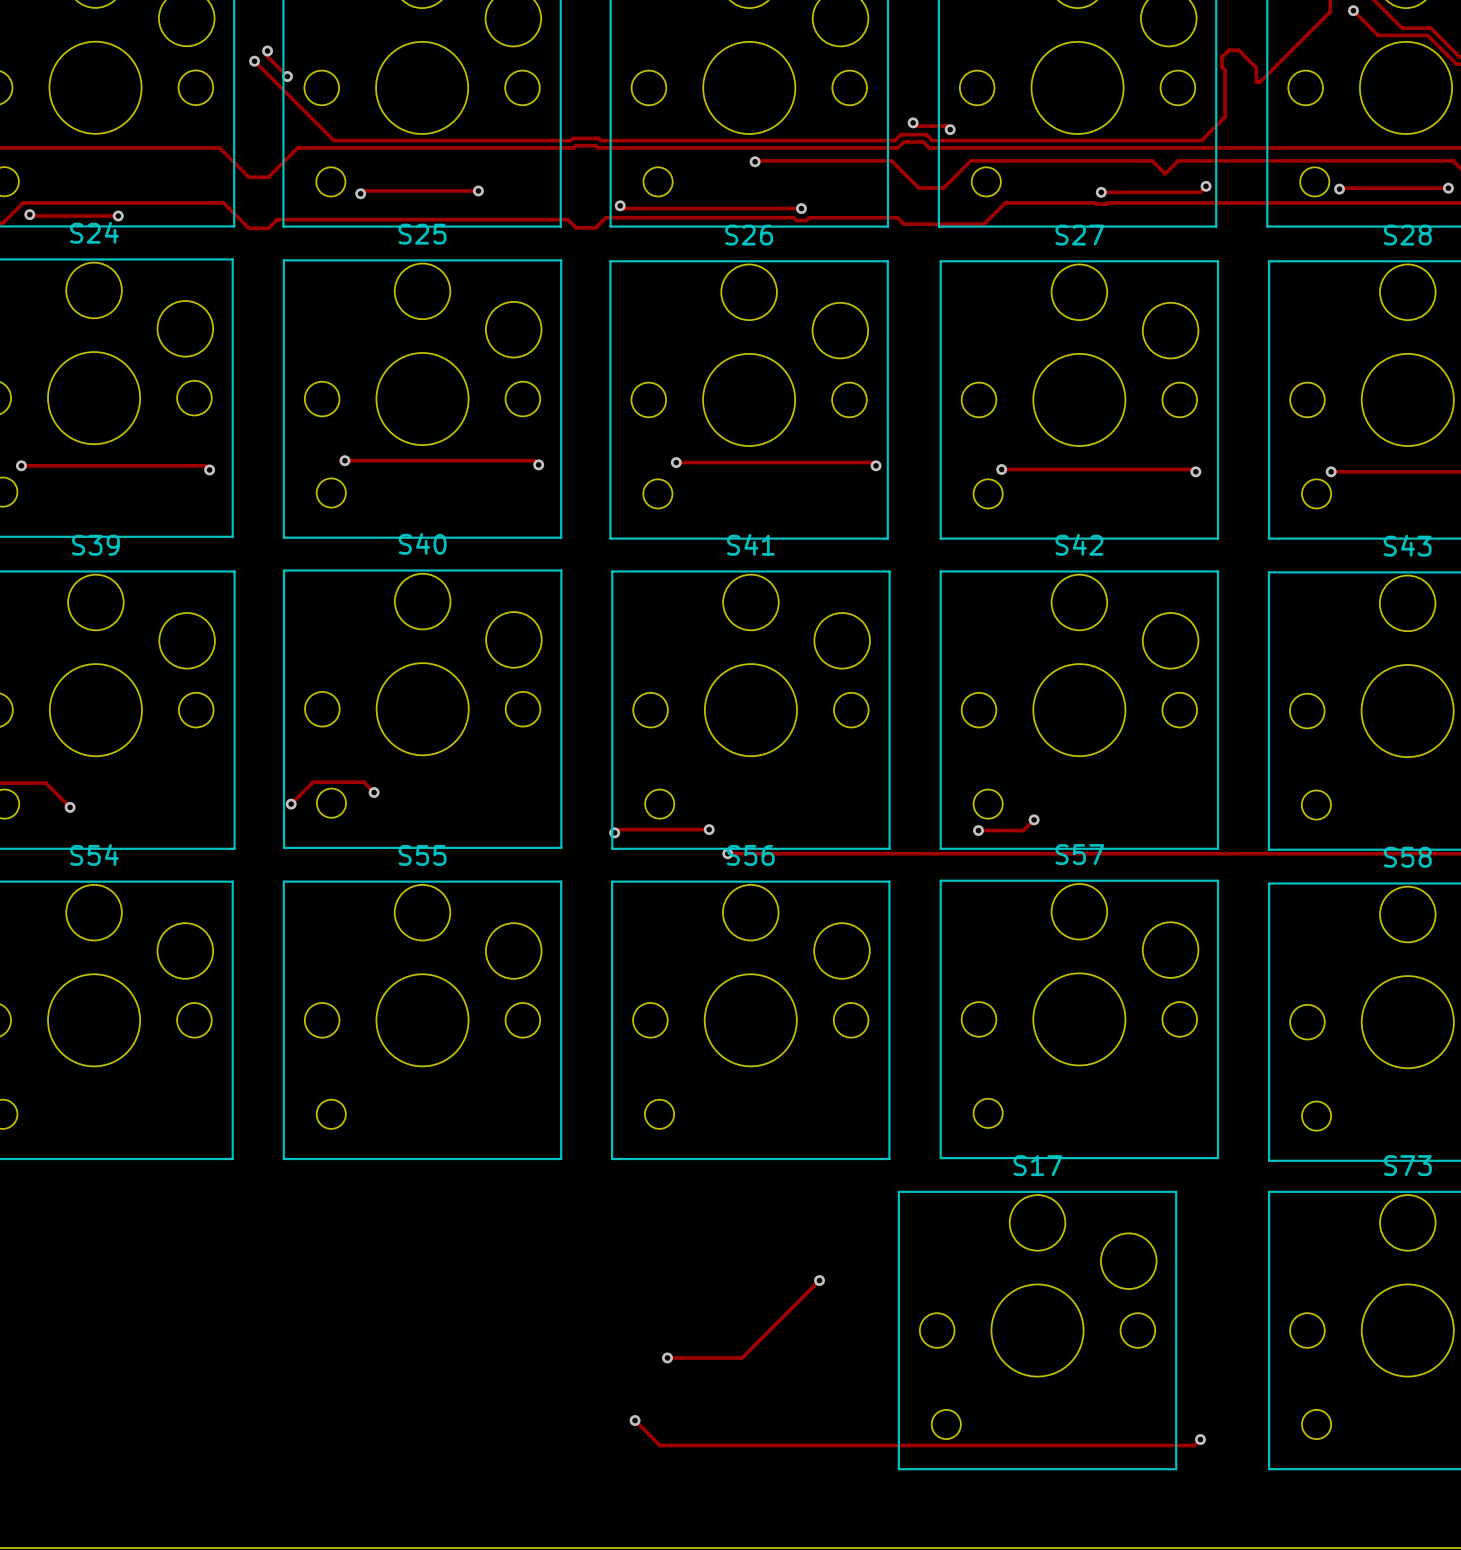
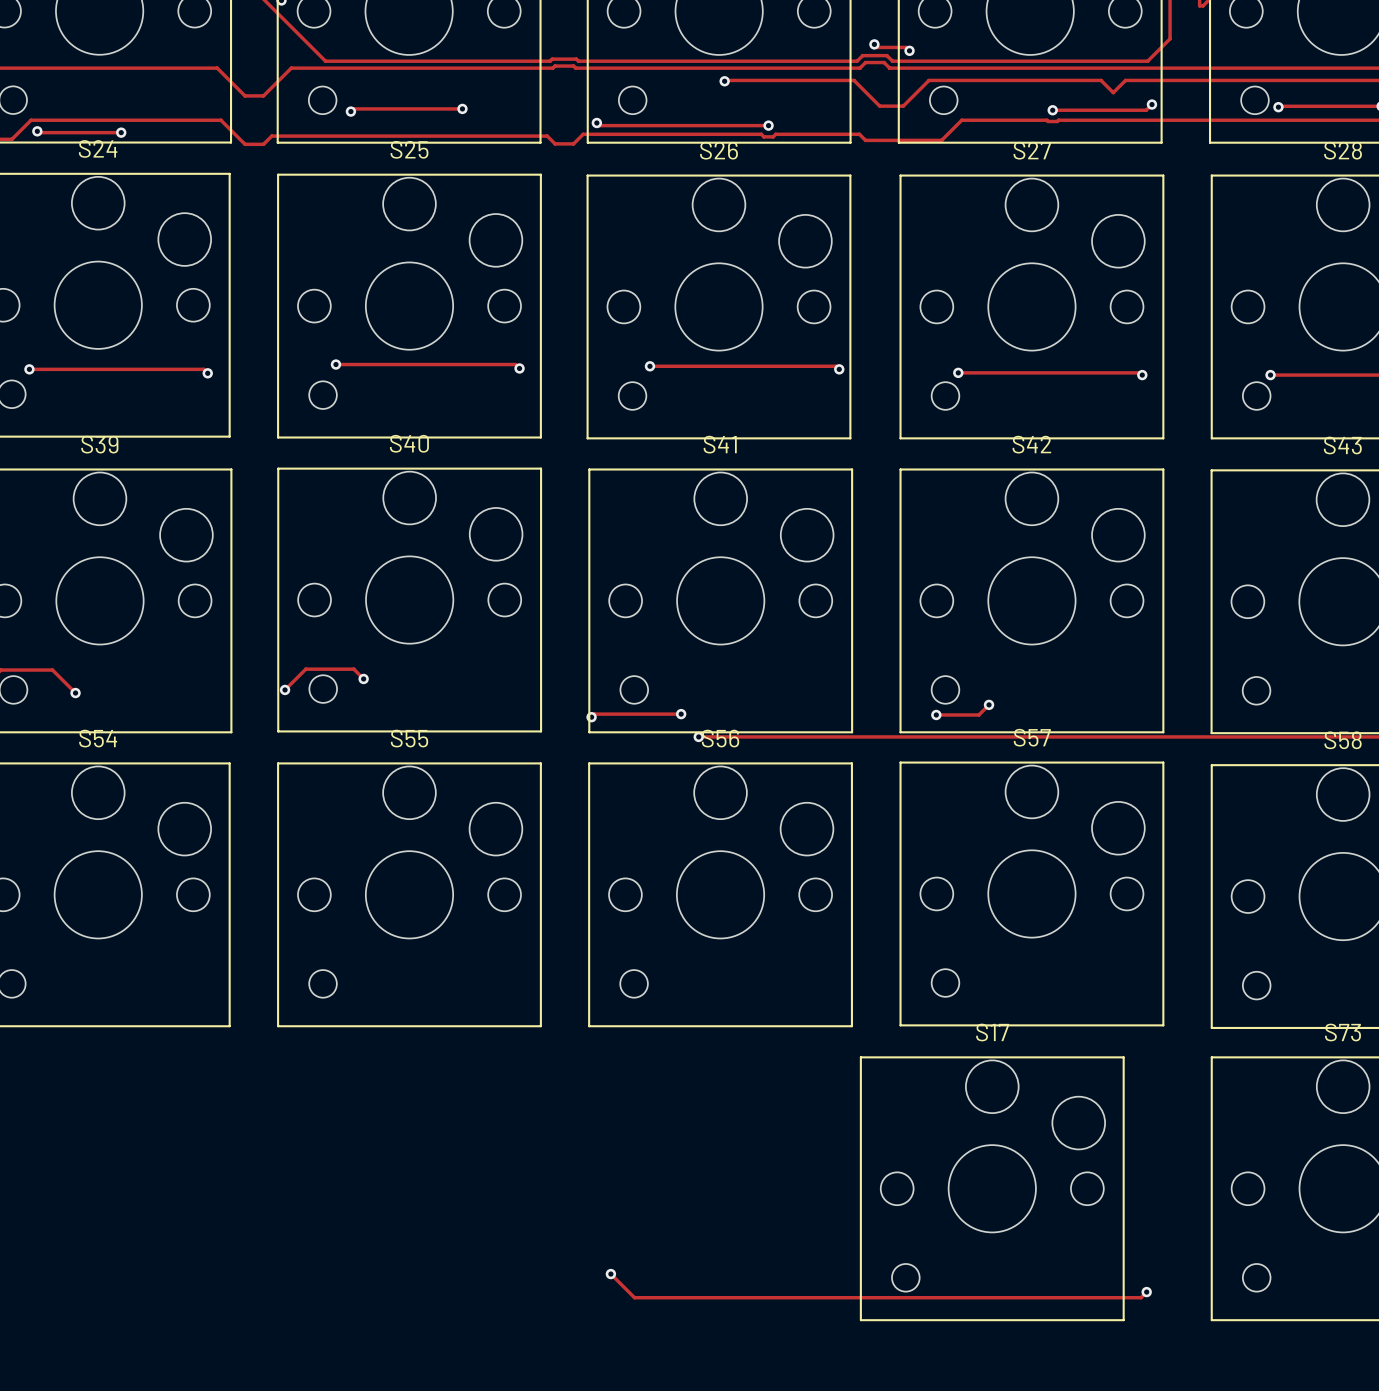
track: (819, 1280) (742, 1357) (667, 1357) -> none
via: (819, 1280) -> none
via: (667, 1357) -> none

